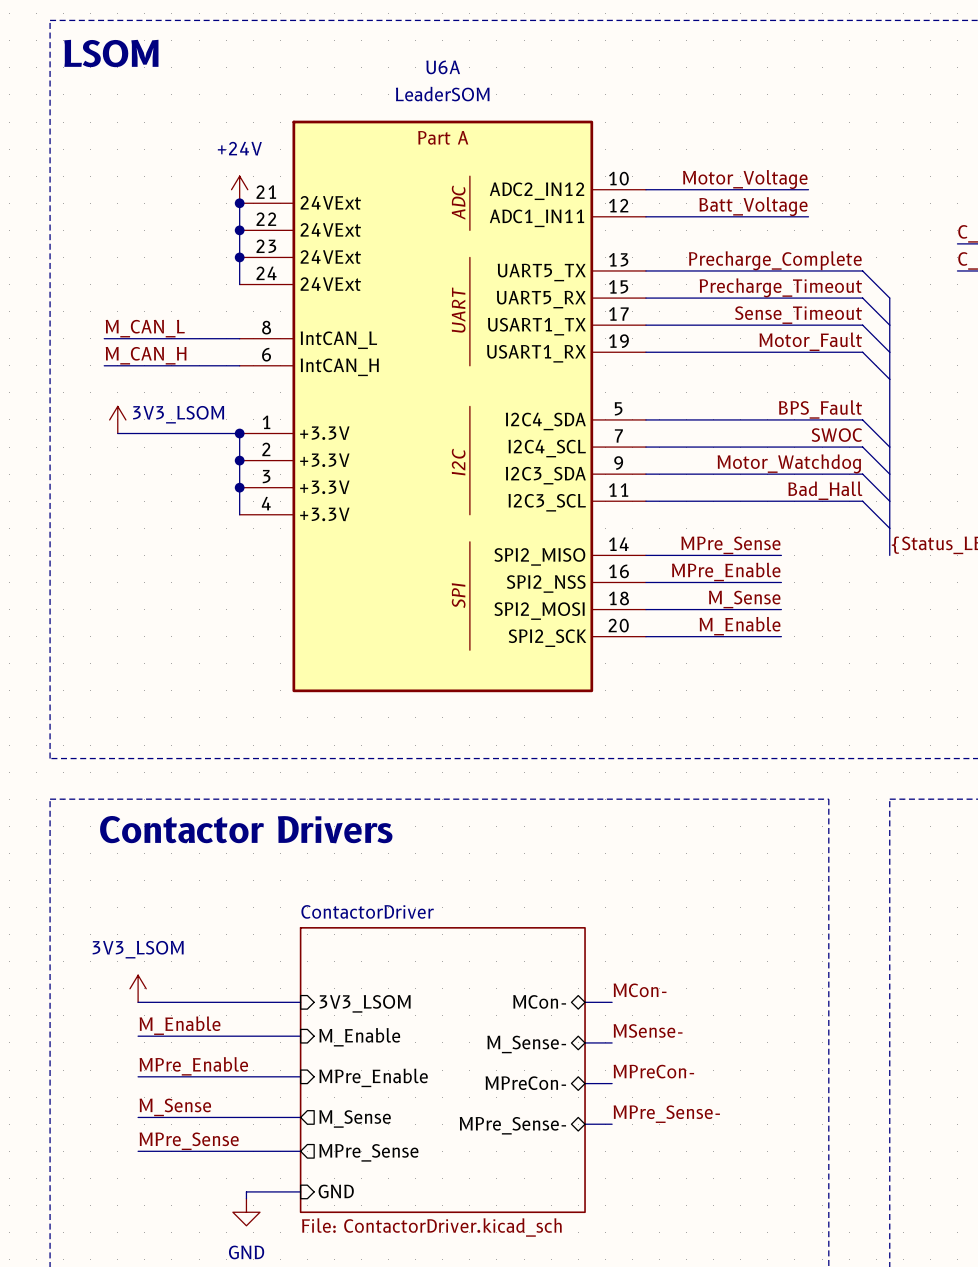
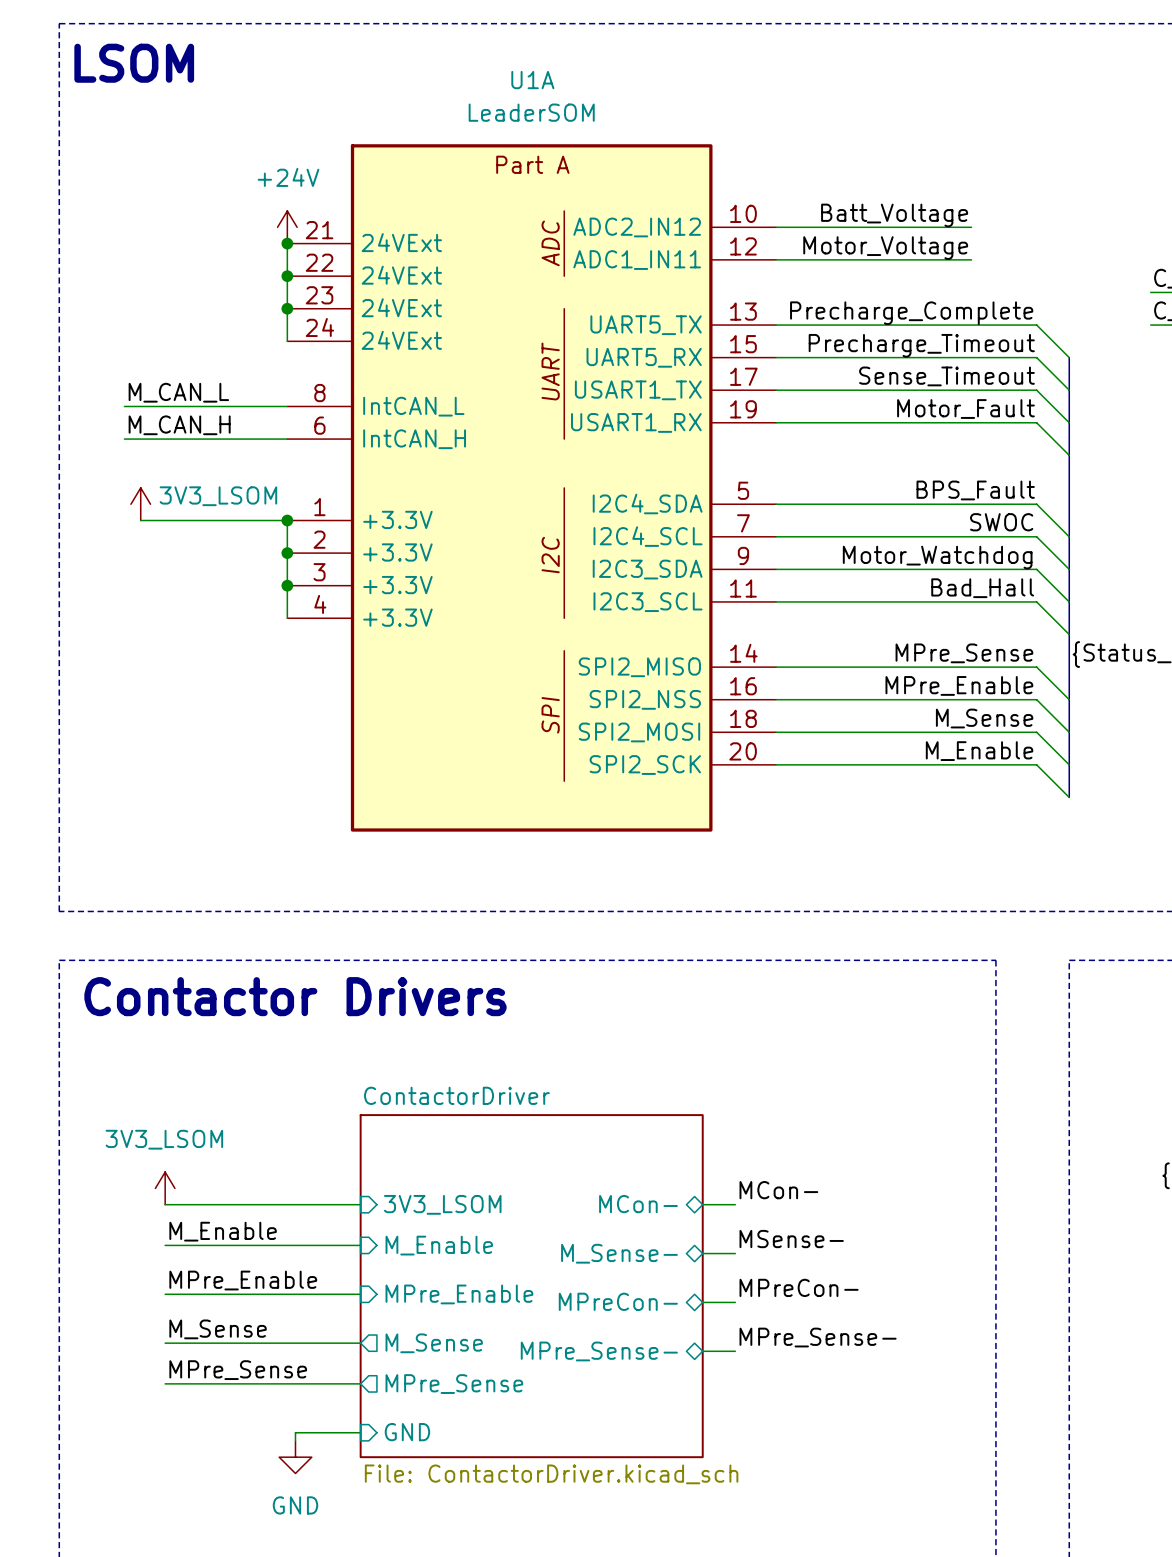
U6A name: U6A (443, 67) -> U1A (532, 80)
label: Motor_Voltage (745, 179) -> Batt_Voltage (894, 215)
label: Batt_Voltage (753, 206) -> Motor_Voltage (885, 248)
label position: MPre_Sense (730, 545) -> MPre_Sense (964, 653)
wire: none -> (938, 667) (1036, 667) (1069, 699)
bus: none -> (1069, 667) (1069, 797)
label position: MPre_Enable (726, 571) -> MPre_Enable (959, 685)
wire: none -> (938, 699) (1036, 699) (1069, 732)
label position: M_Sense (744, 599) -> M_Sense (984, 718)
wire: none -> (938, 732) (1036, 732) (1069, 764)
label position: M_Enable (740, 626) -> M_Enable (979, 751)
wire: none -> (938, 764) (1036, 764) (1069, 797)

